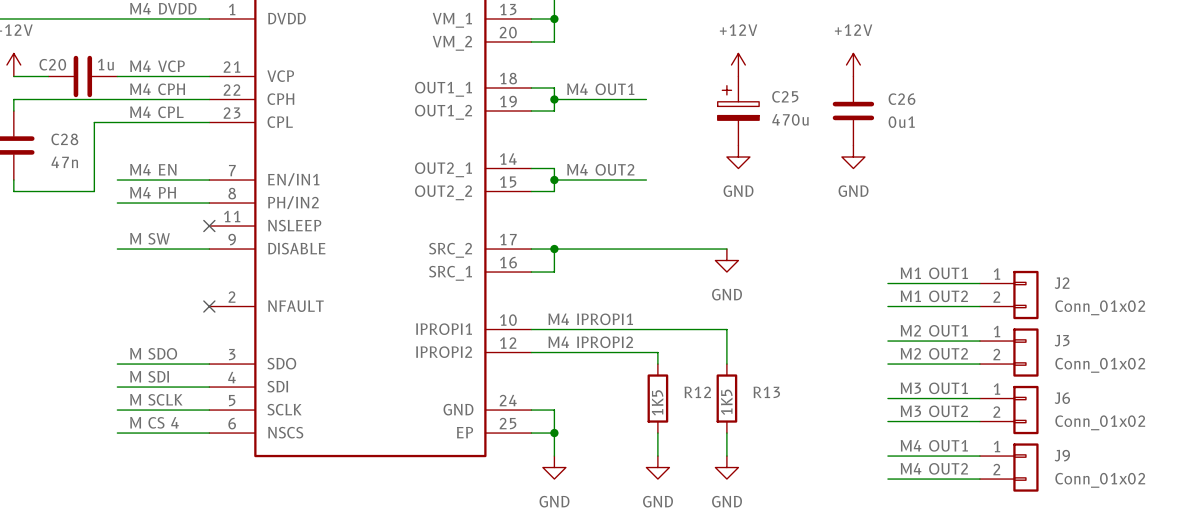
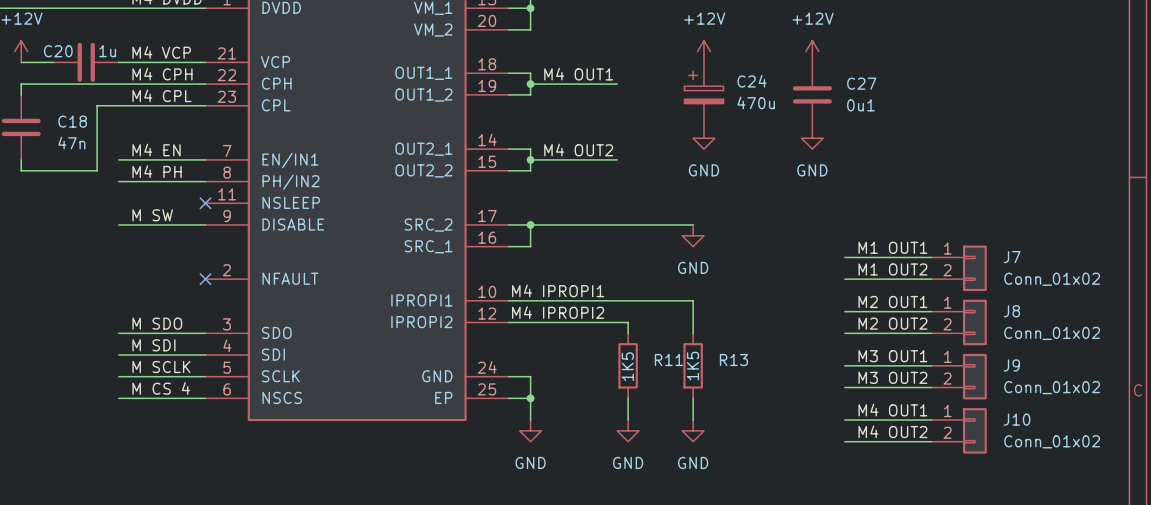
C25 name: C25 (785, 96) -> C24 (752, 81)
C26 name: C26 (901, 99) -> C27 (861, 83)
C28 name: C28 (64, 139) -> C18 (72, 121)
J2 name: J2 (1062, 283) -> J7 (1012, 257)
J3 name: J3 (1062, 340) -> J8 (1011, 311)
R12 name: R12 (697, 392) -> R11 (668, 360)
J6 name: J6 (1062, 398) -> J9 (1011, 365)
J9 name: J9 (1062, 455) -> J10 (1017, 419)

